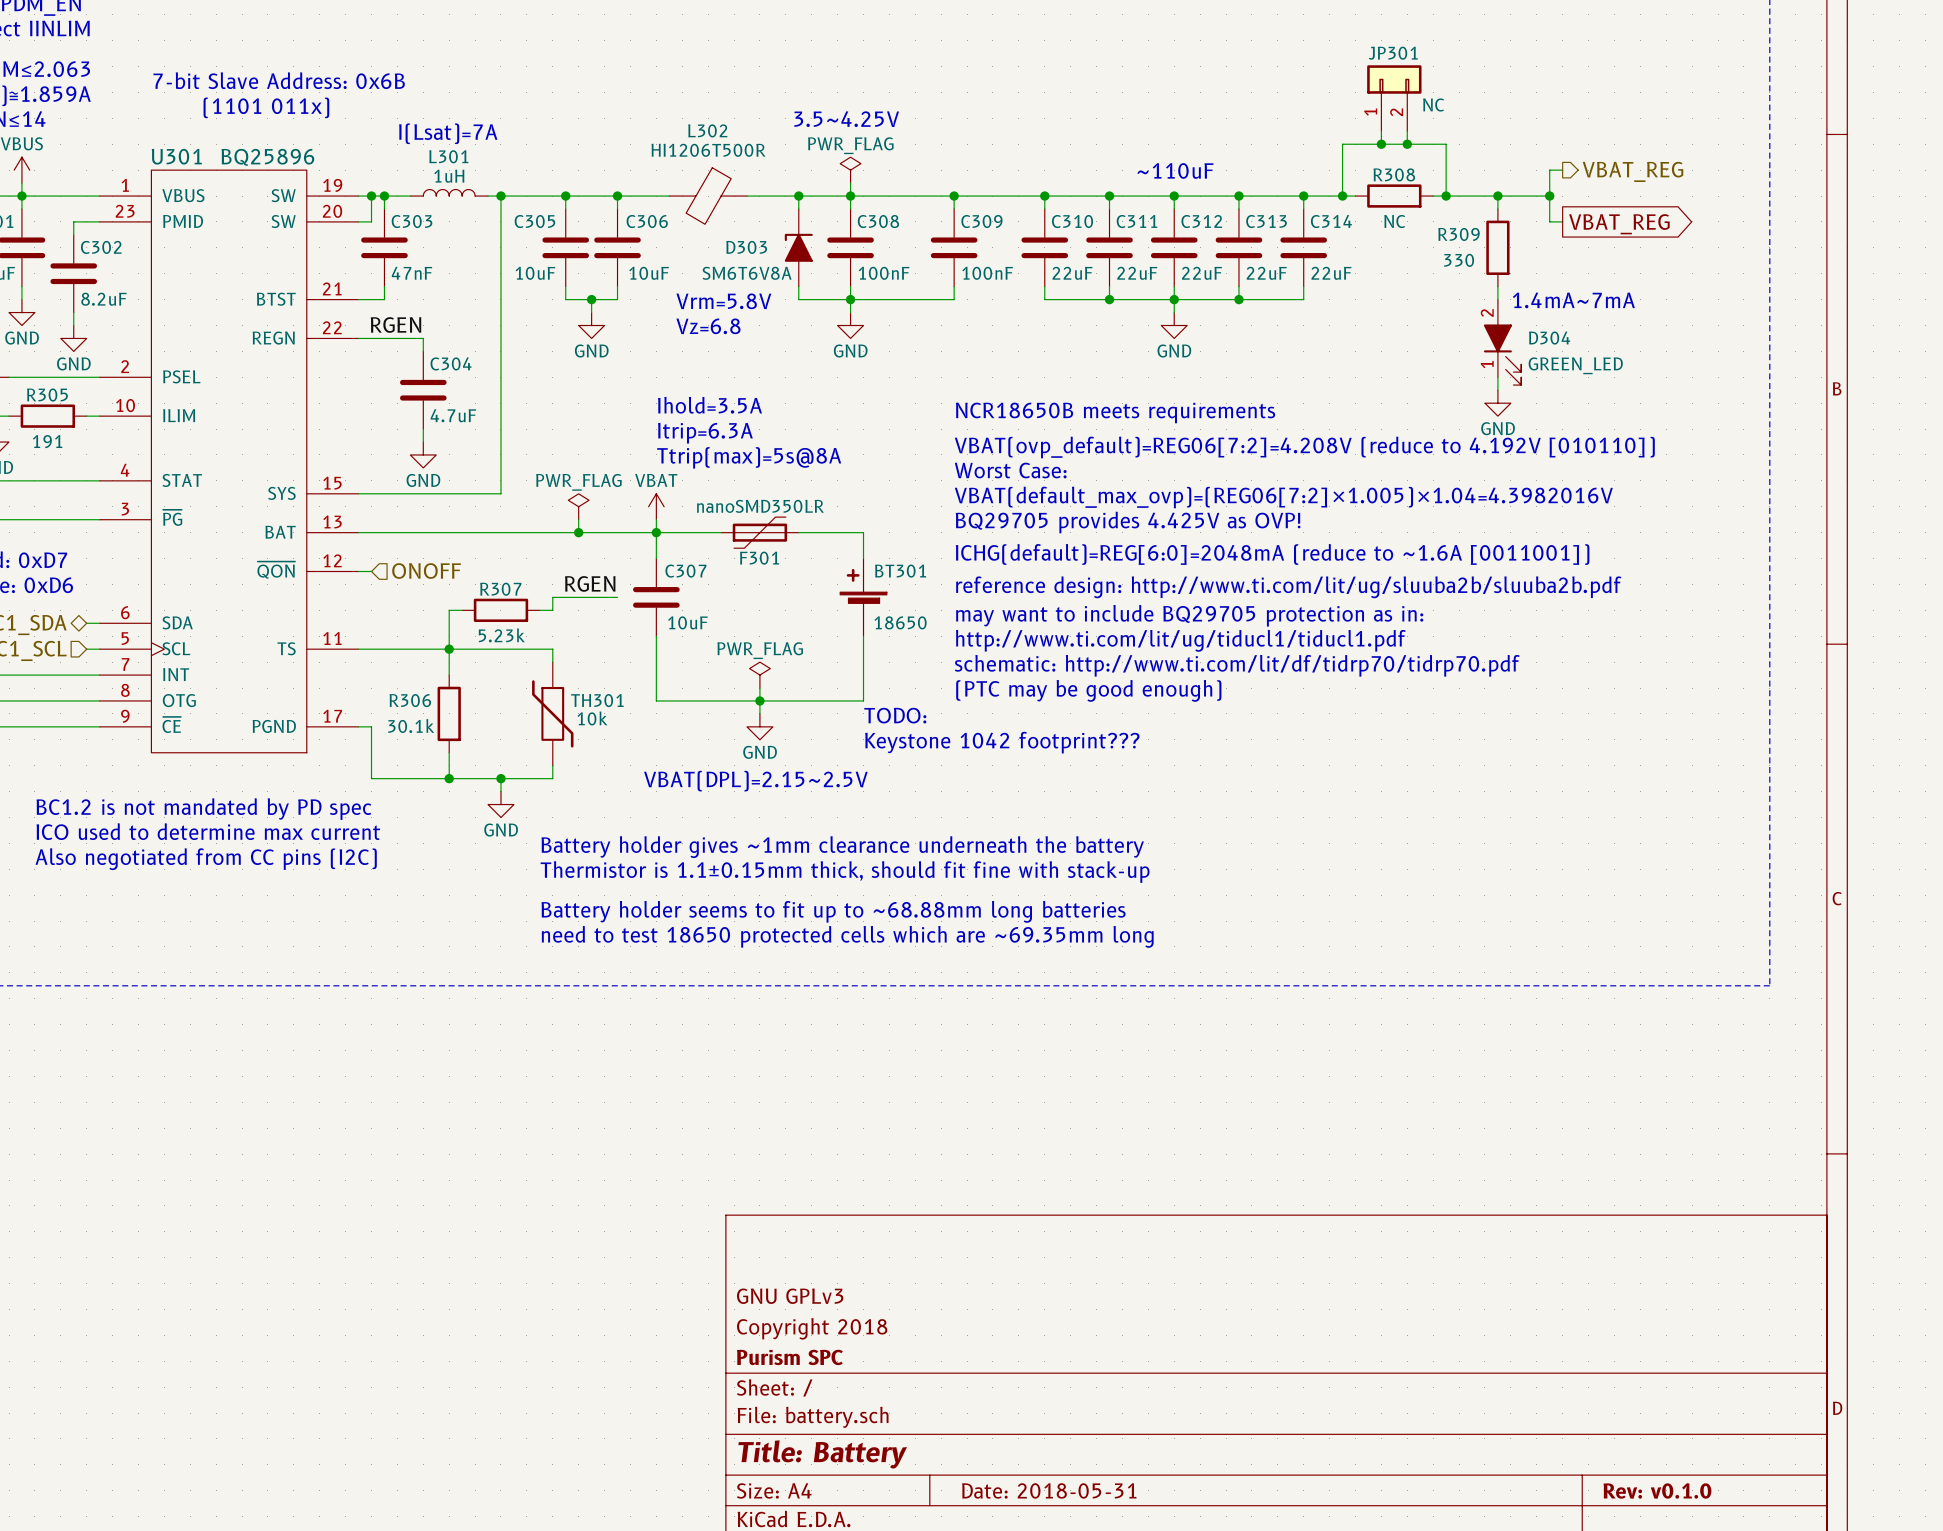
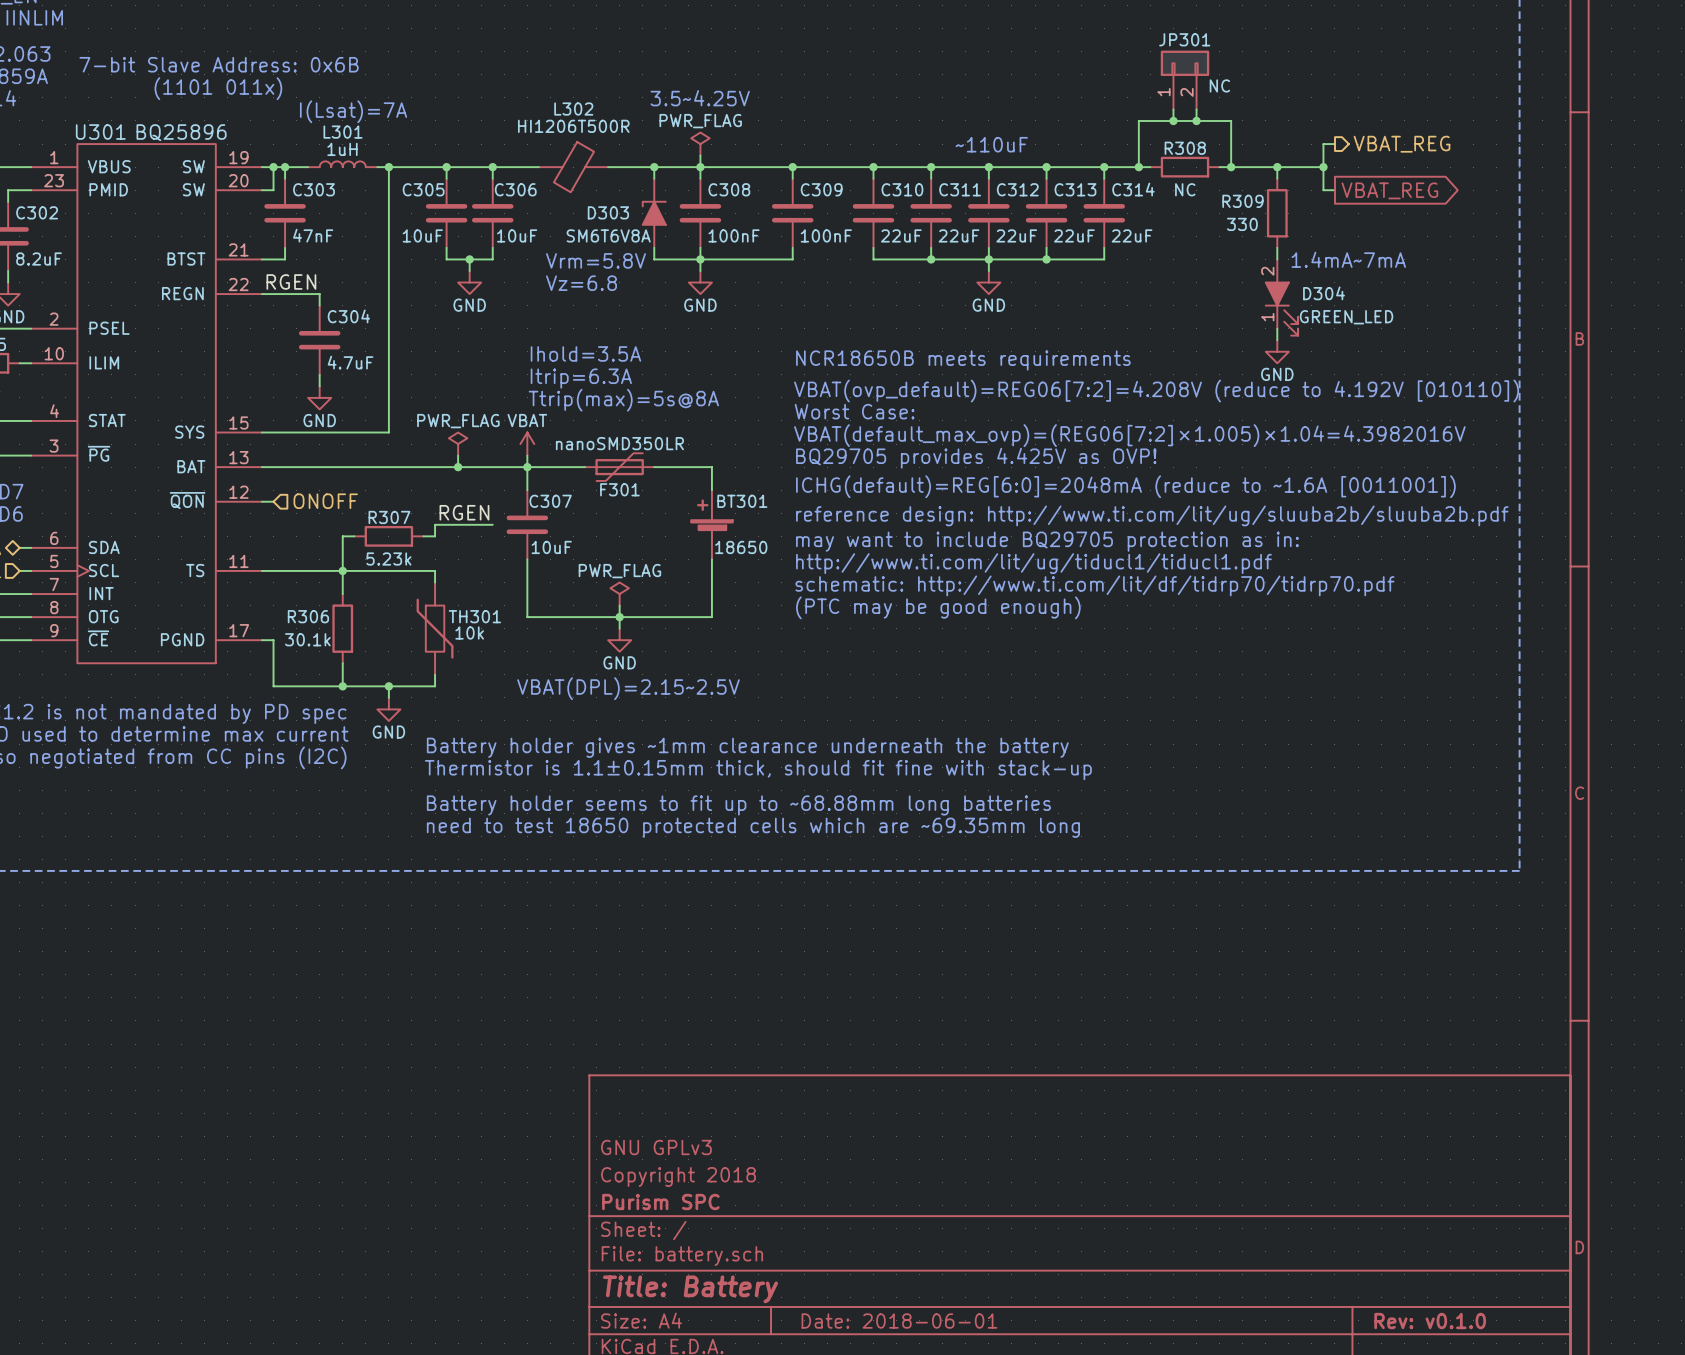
text: TODO: (895, 715) -> none
text: Keystone 1042 footprint??? (1002, 742) -> none
title block: Date: 2018-05-31 (1049, 1490) -> Date: 2018-06-01 (899, 1321)

